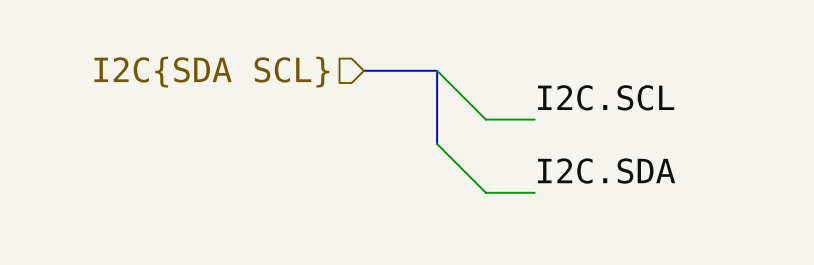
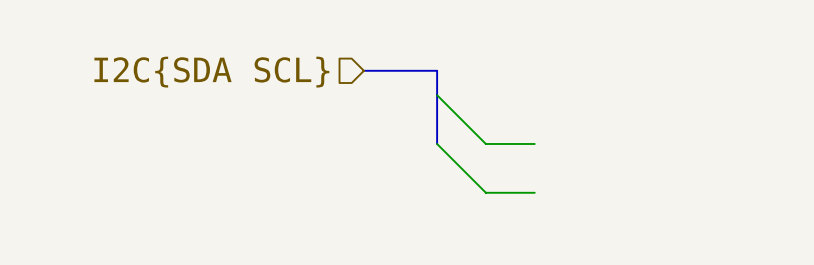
wire: (437, 70) (485, 119) (534, 119) -> (437, 95) (485, 143) (534, 143)
label: I2C.SCL (606, 97) -> none
label: I2C.SDA (606, 171) -> none

